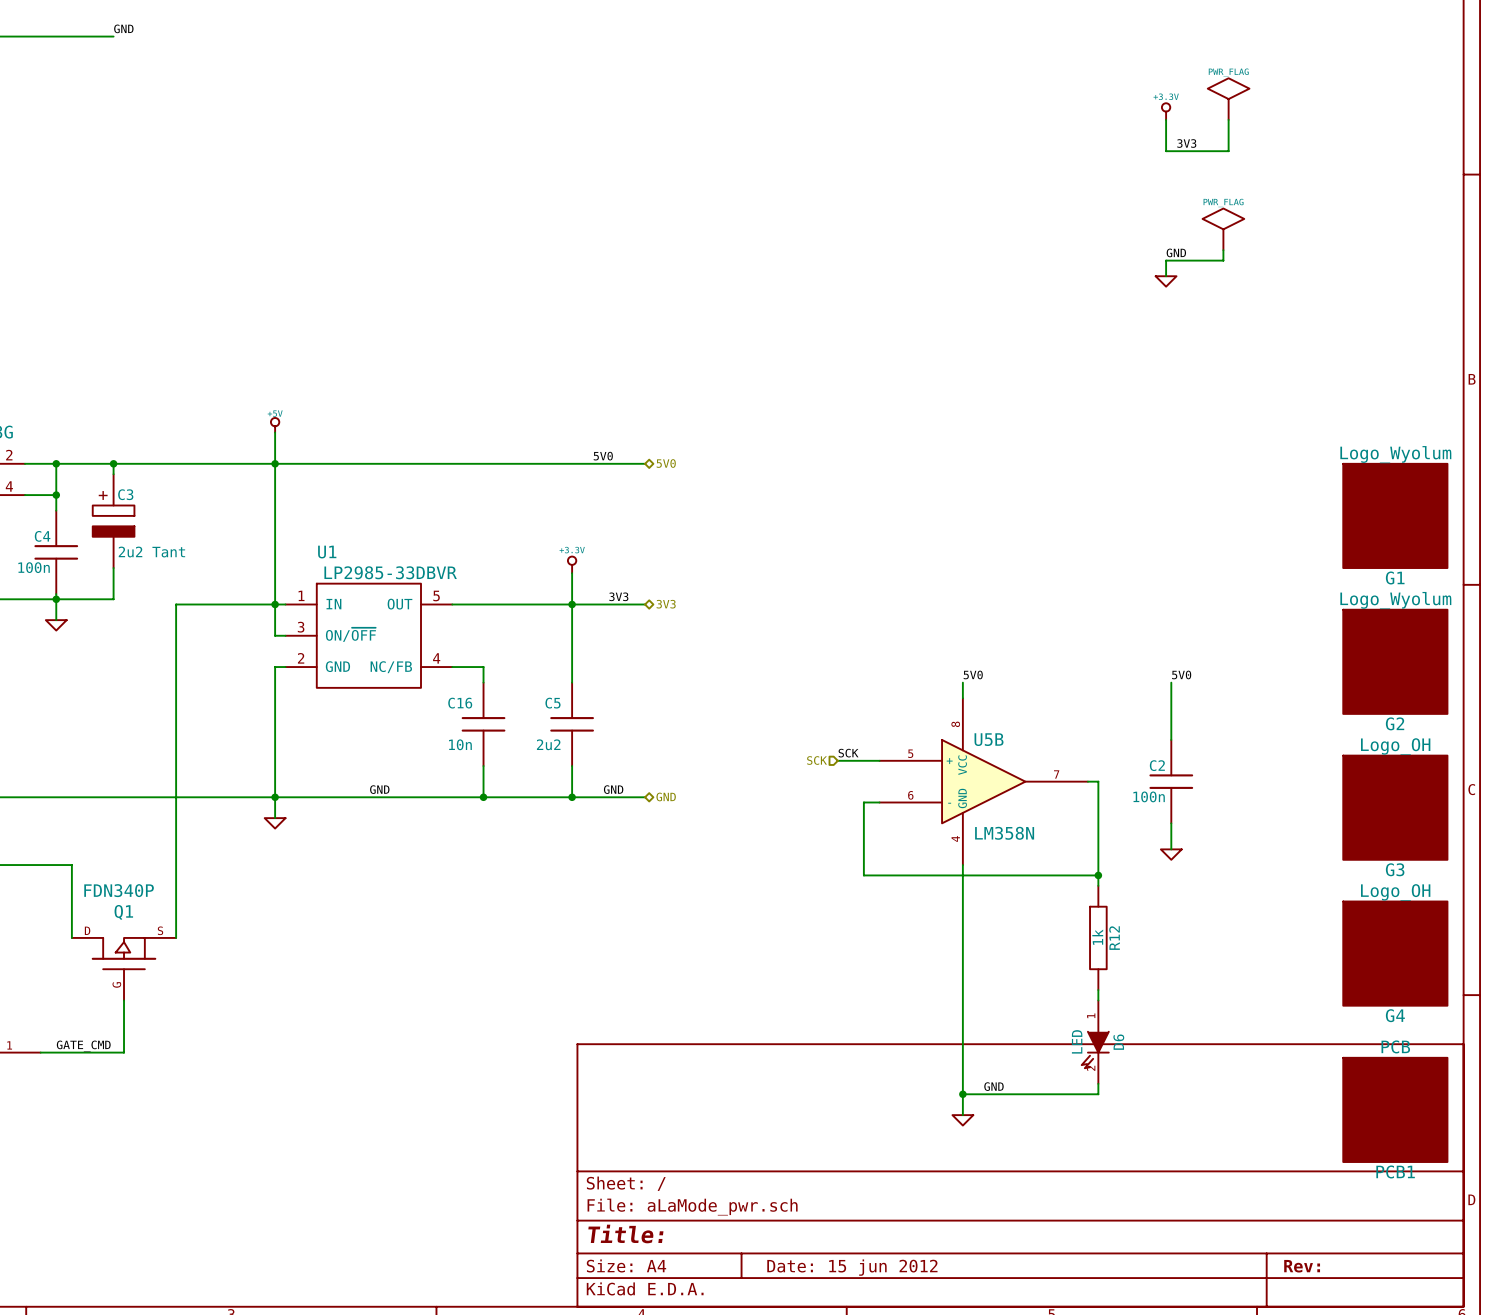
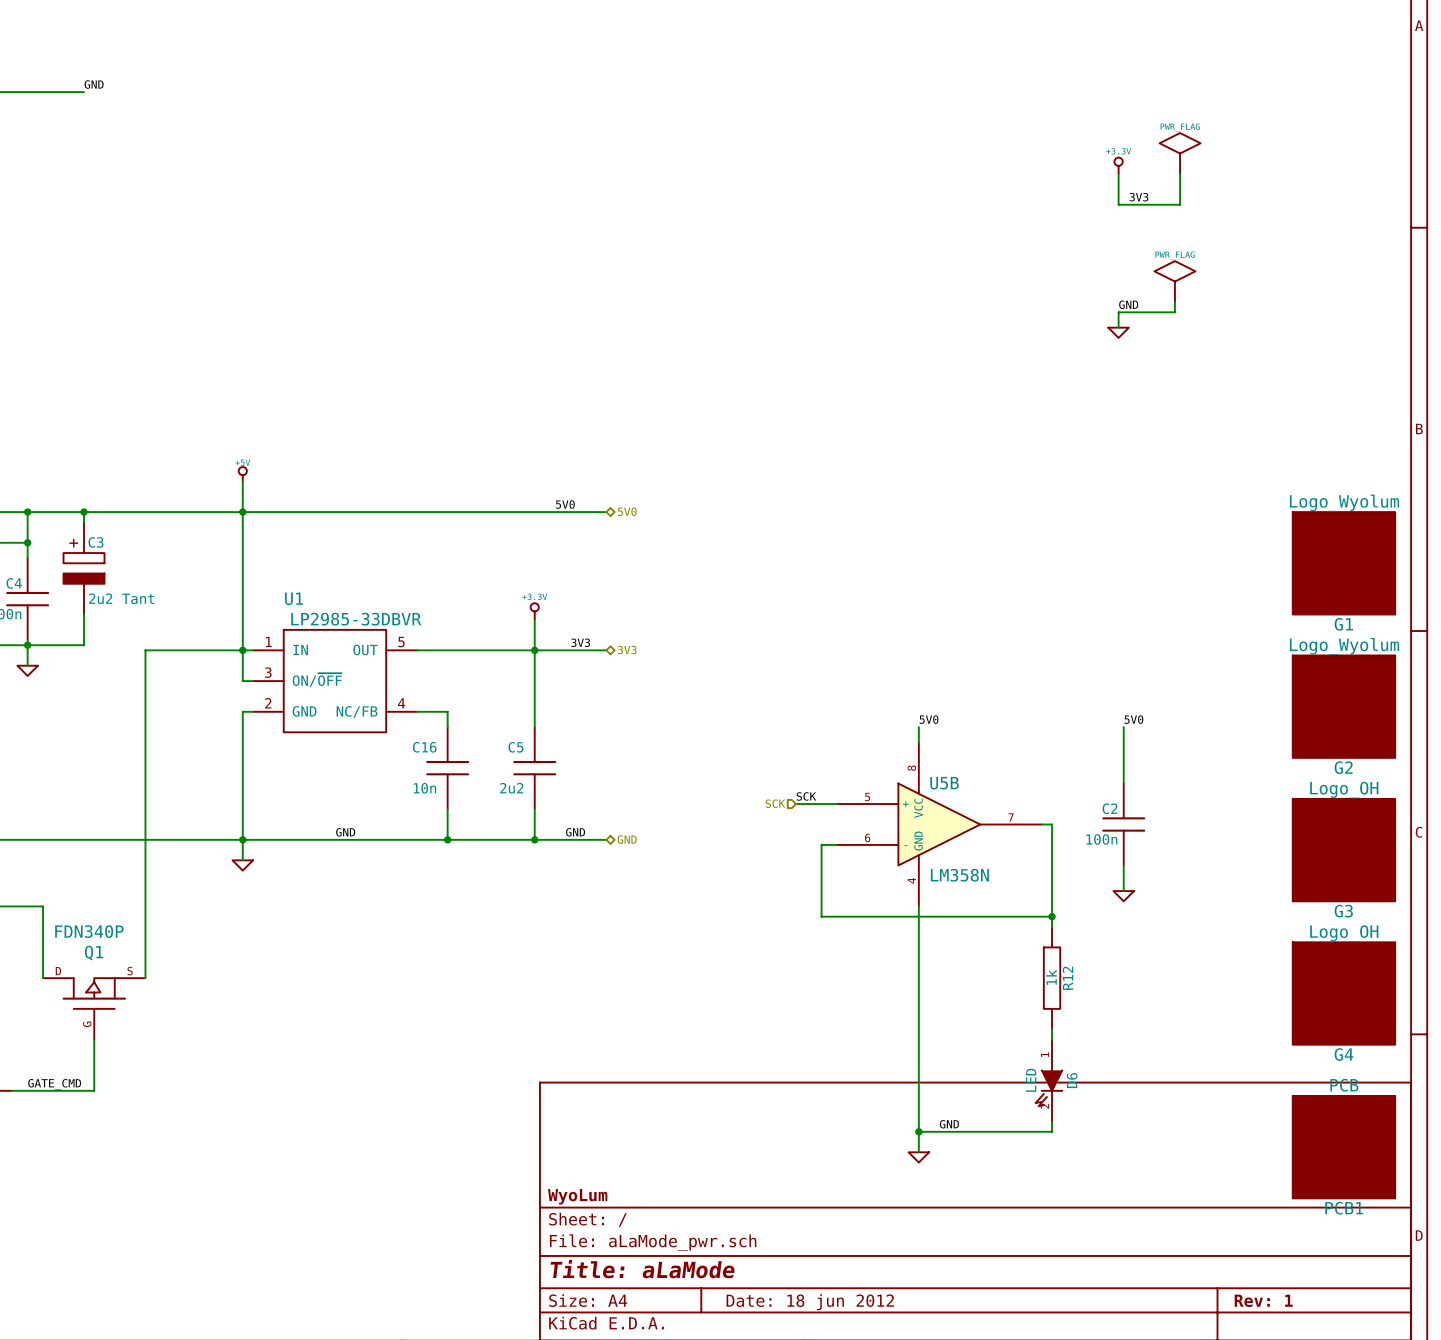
title block: none -> WyoLum (577, 1196)
title block: Title: (625, 1233) -> Title: aLaMode (642, 1269)
title block: Rev: (1302, 1266) -> Rev: 1 (1263, 1300)
title block: Date: 15 jun 2012 (852, 1267) -> Date: 18 jun 2012 (810, 1302)

